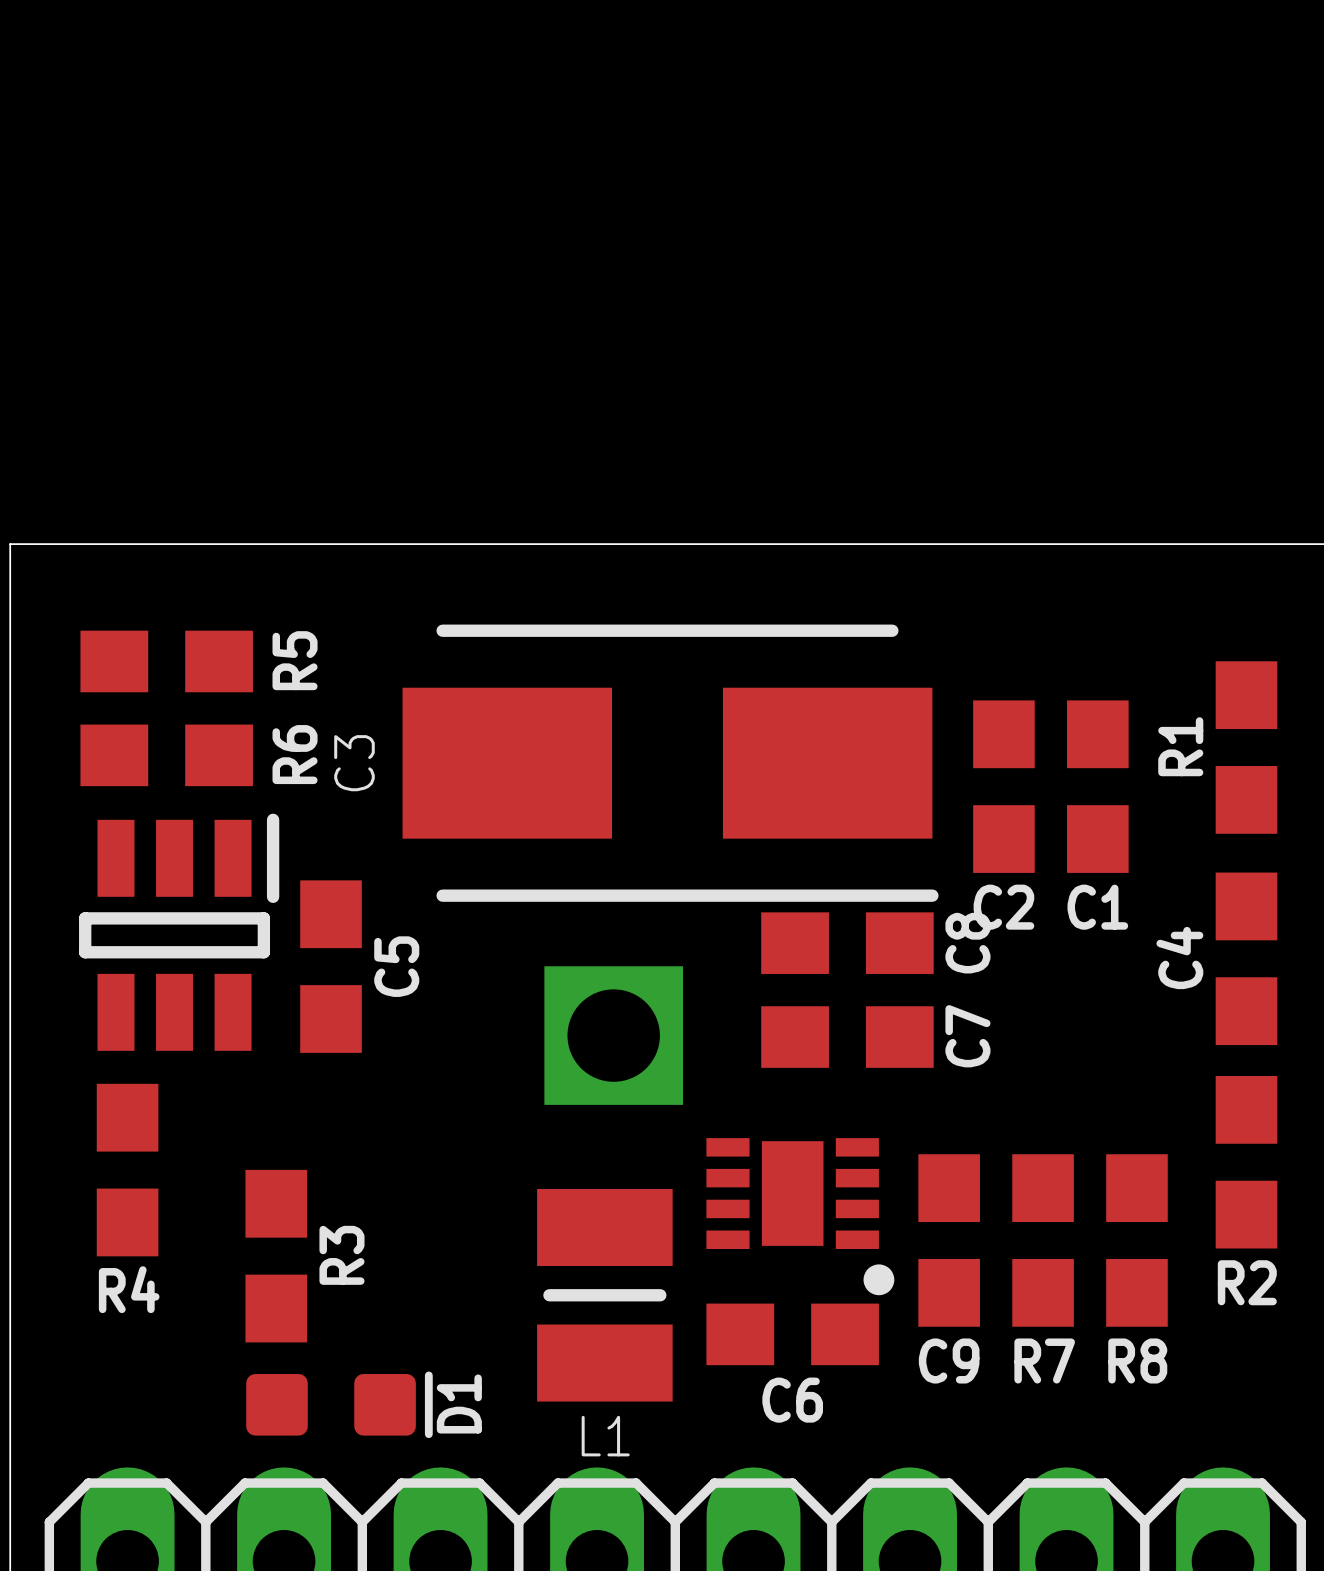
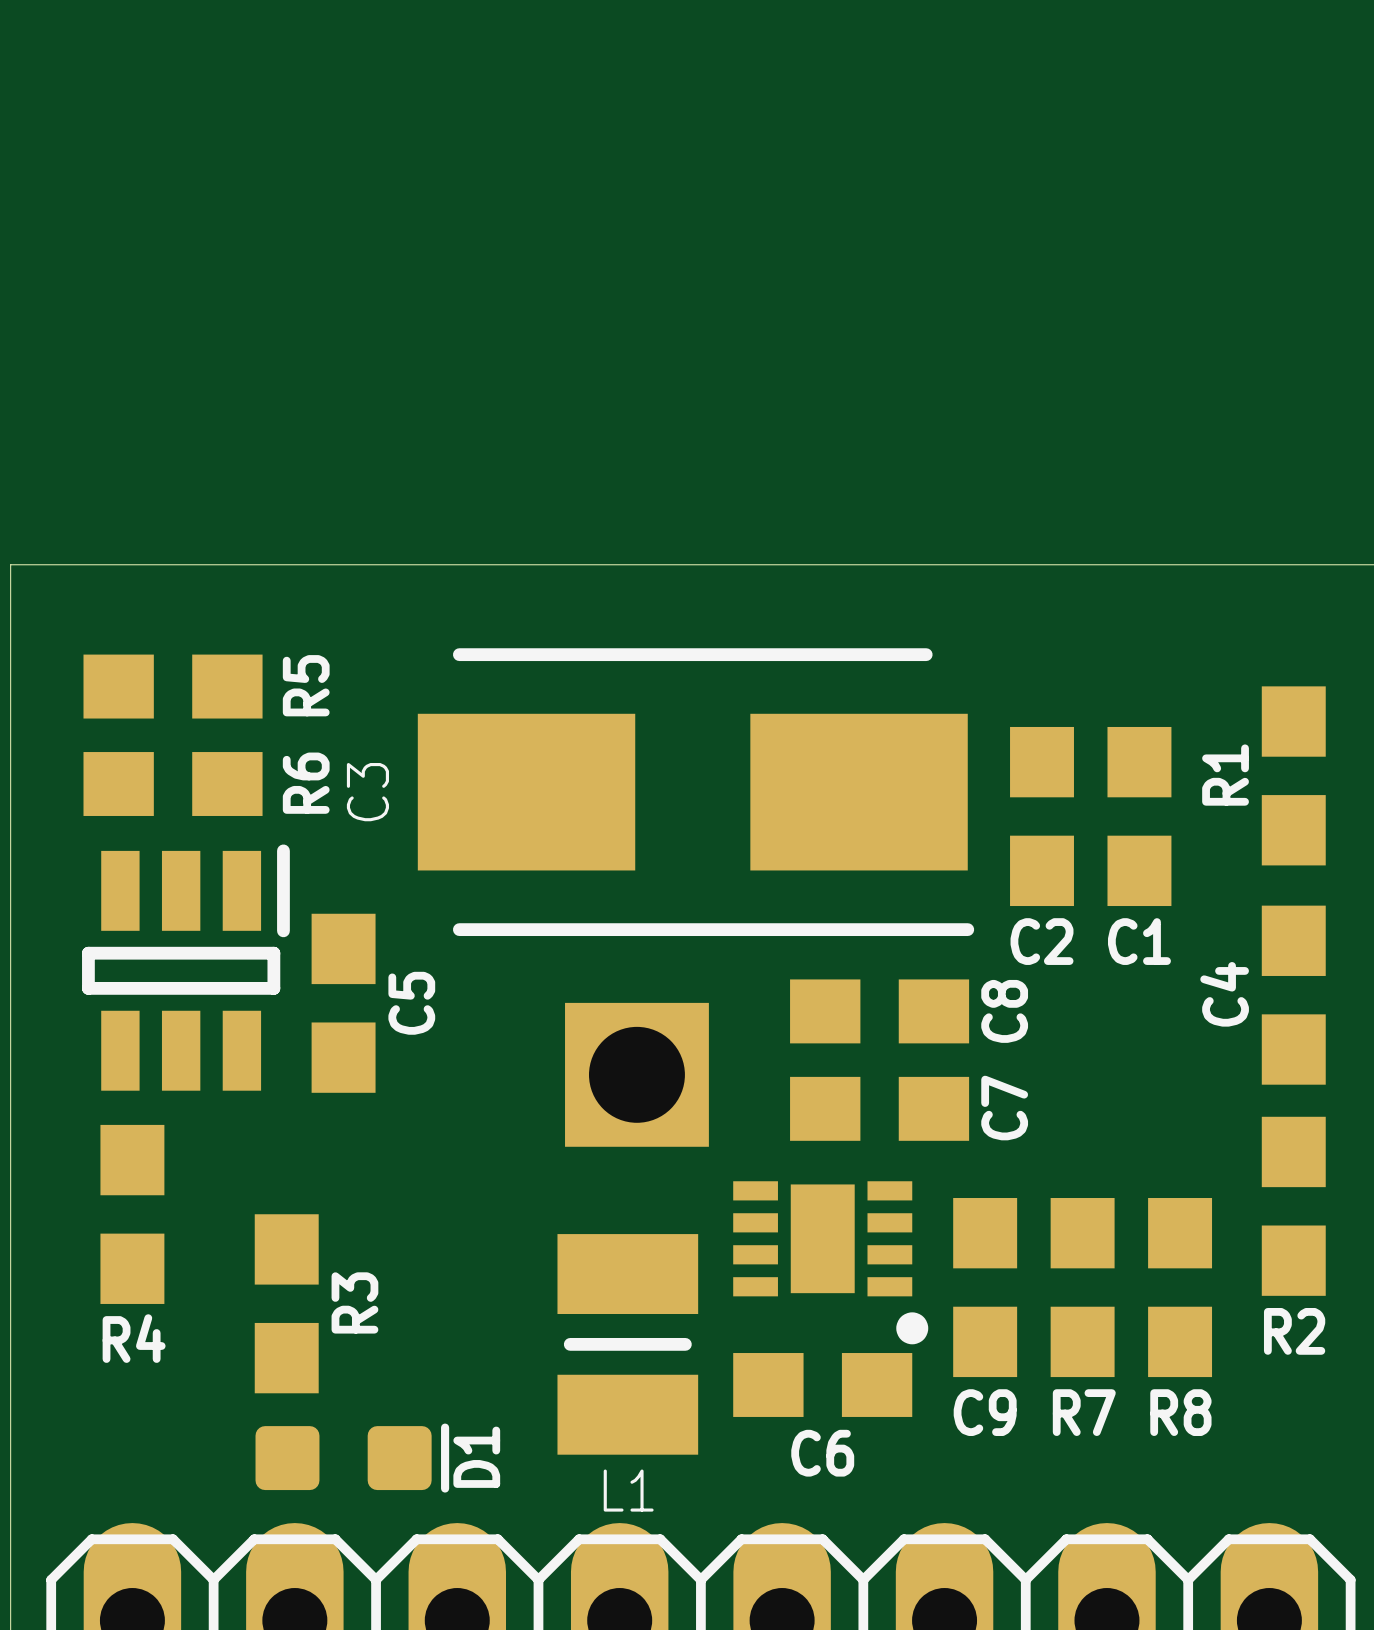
C8 position: (847, 943) -> (879, 1011)
C7 position: (847, 1037) -> (879, 1108)

